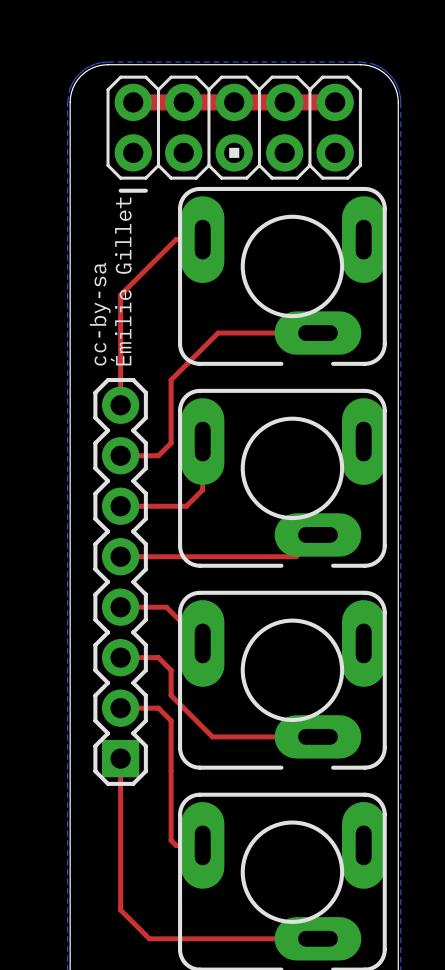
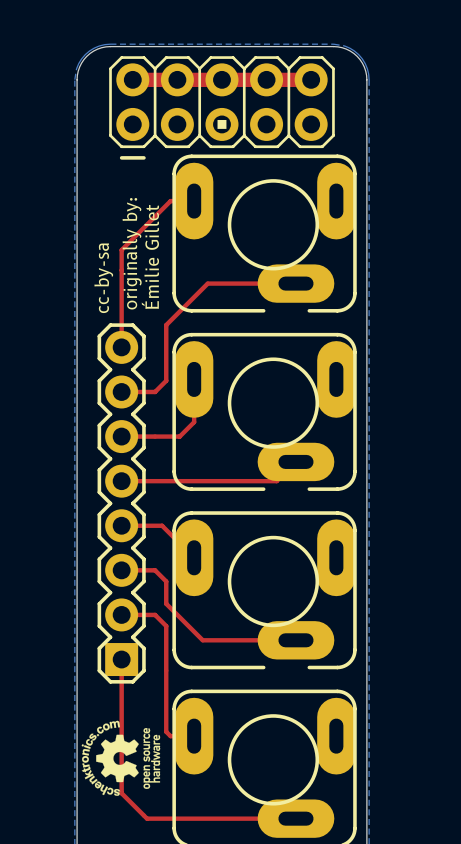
text: none -> Émilie Gillet (150, 256)
text: Émilie Gillet (121, 281) -> originally by: (132, 253)
drawing: none -> [81, 720, 161, 796]

